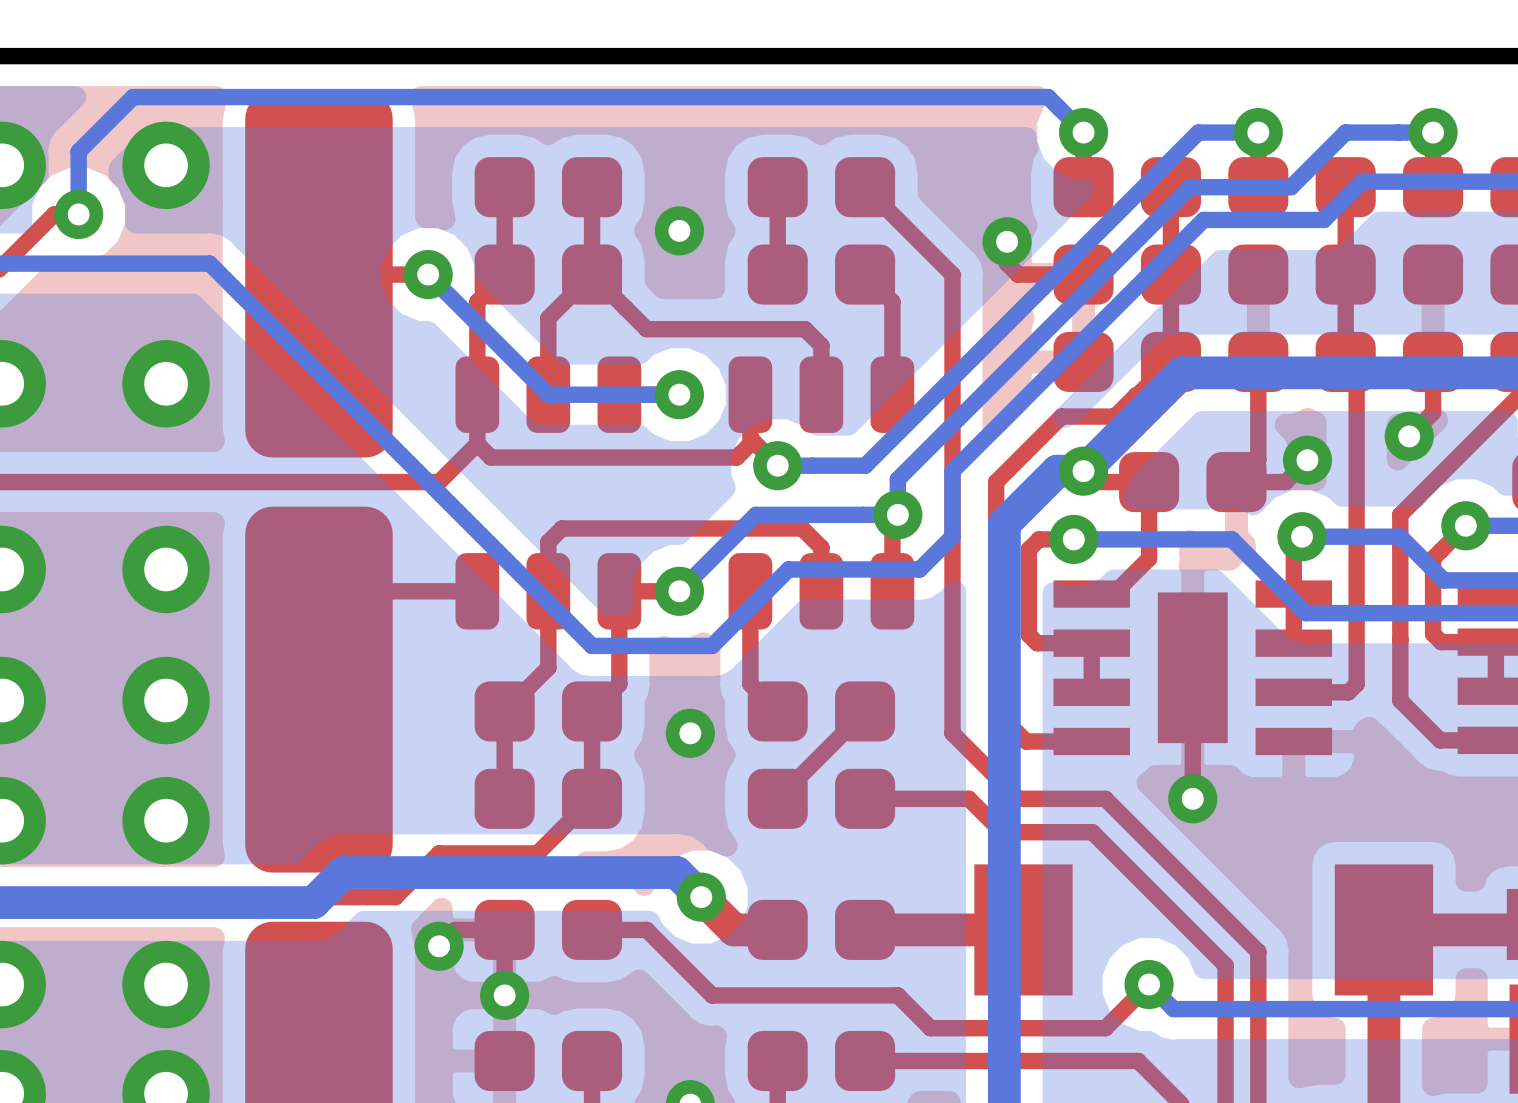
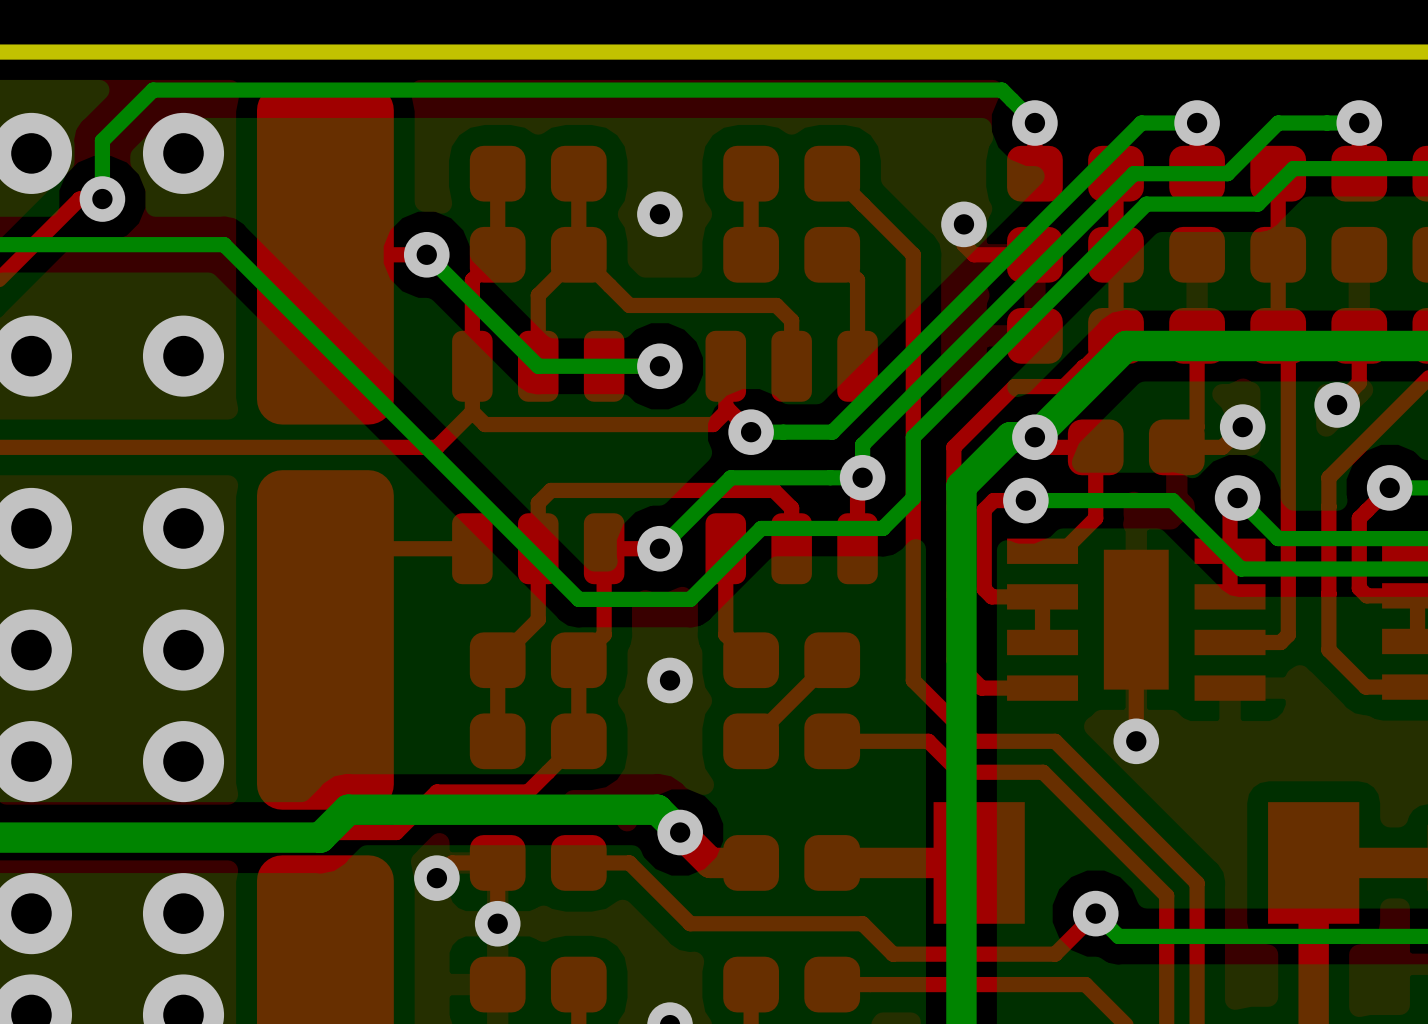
bottom track: (1302, 536) (1400, 536) (1444, 580) -> (1237, 498) (1278, 538) (1369, 538)

